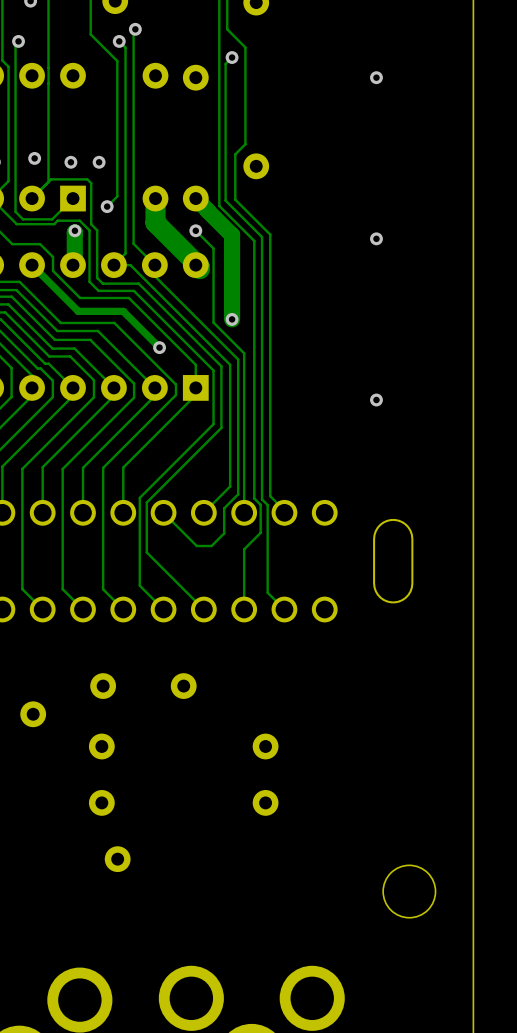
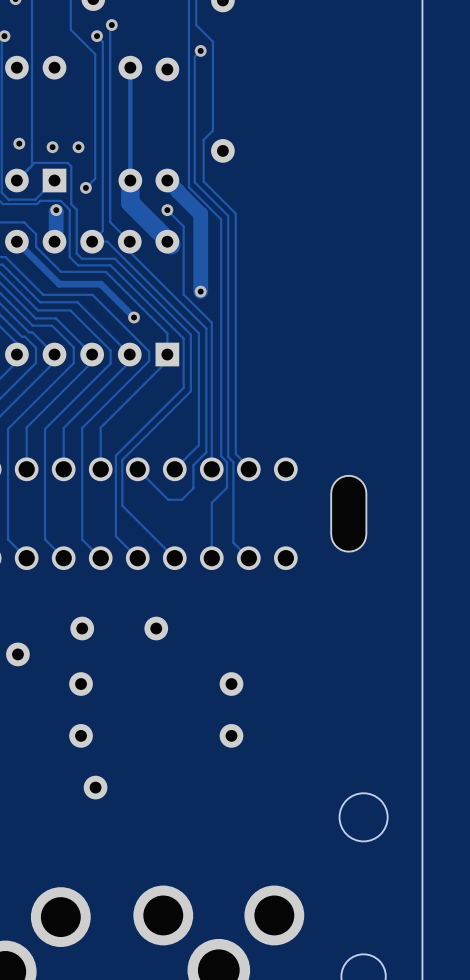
track: none -> (130, 67) (130, 180)
via: (376, 77) -> none
via: (376, 238) -> none
via: (376, 400) -> none

